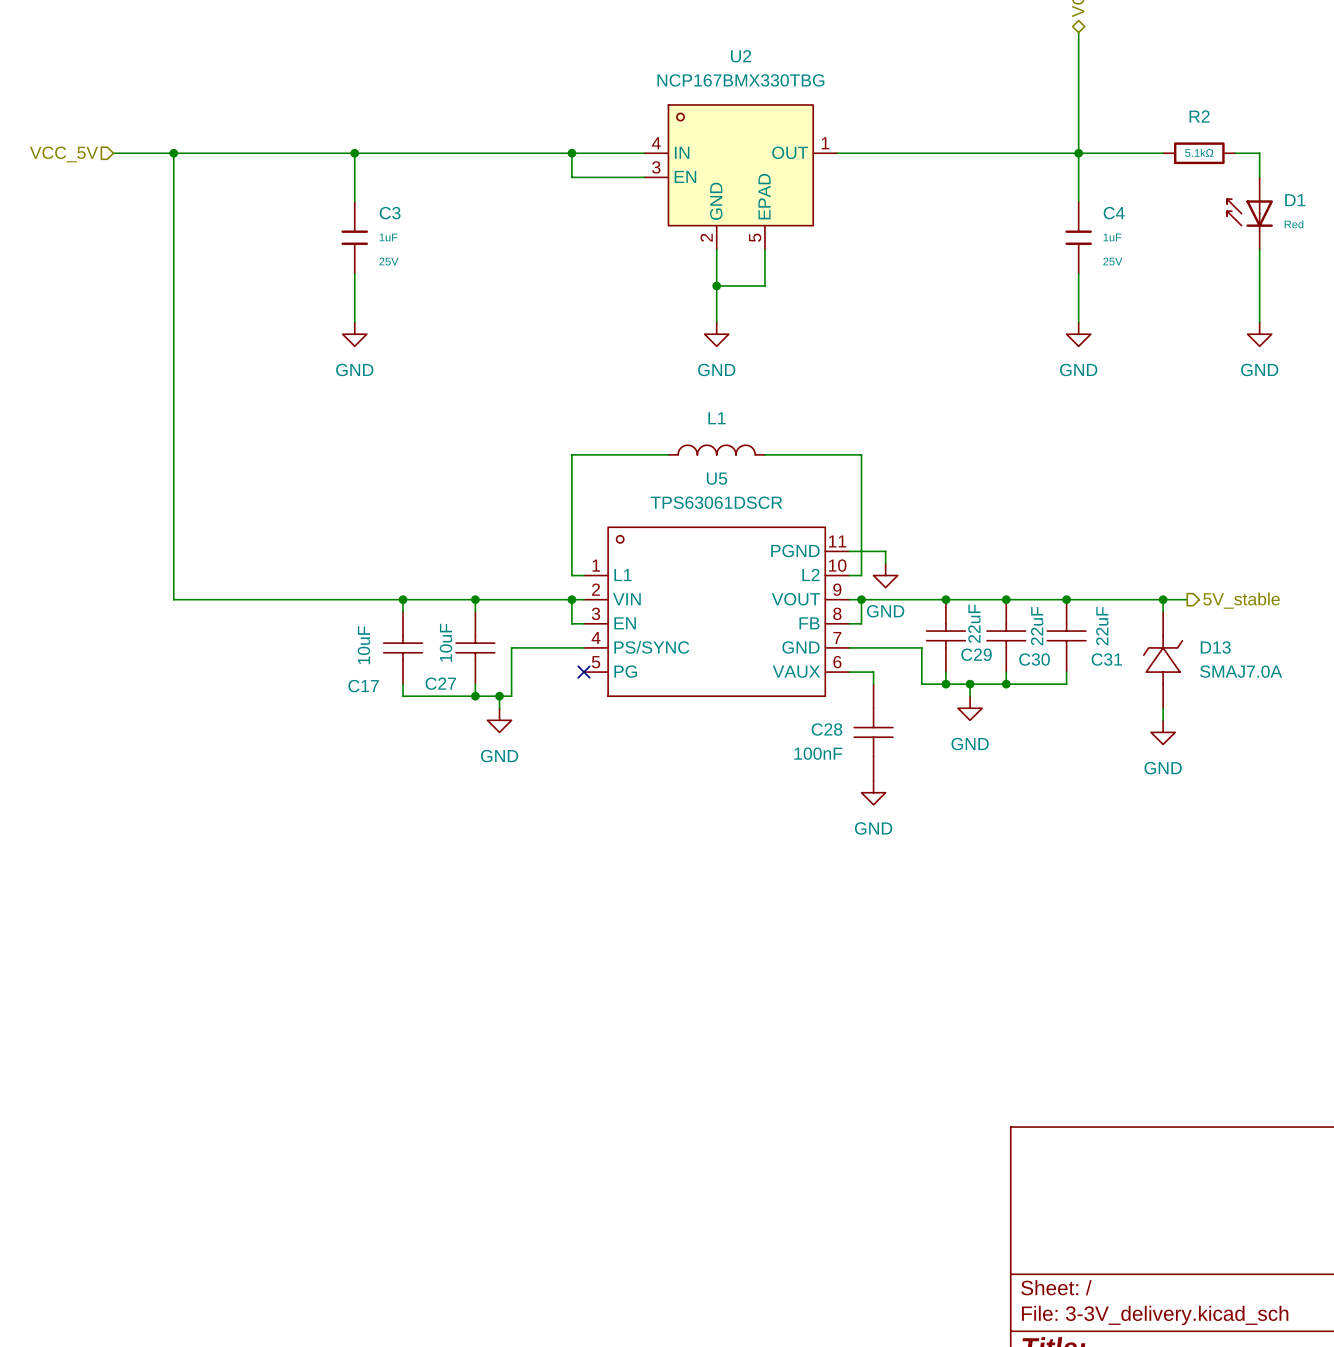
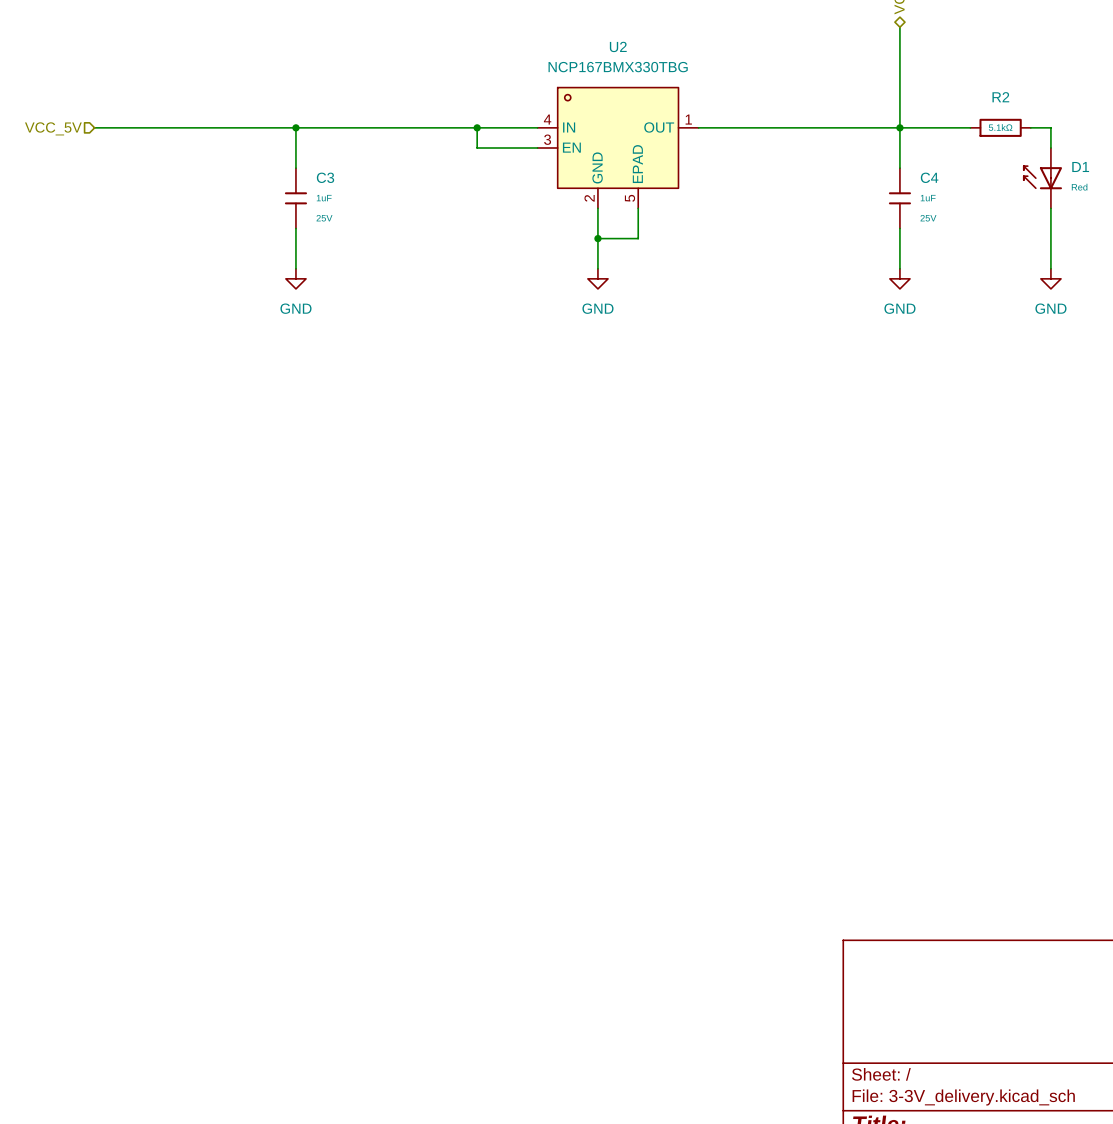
wire: (173, 153) (173, 599) (583, 599) -> none
junction: (173, 153) -> none
L1: (716, 450) -> none
wire: (668, 454) (571, 454) (571, 575) (583, 575) -> none
wire: (764, 454) (861, 454) (861, 575) (849, 575) -> none
wire: (849, 551) (885, 551) (885, 563) -> none
power symbol: GND (885, 575) -> none
wire: (403, 599) (403, 611) -> none
junction: (403, 599) -> none
wire: (475, 599) (475, 611) -> none
junction: (475, 599) -> none
wire: (571, 599) (571, 623) (583, 623) -> none
junction: (571, 599) -> none
wire: (849, 599) (1187, 599) -> none
wire: (861, 599) (861, 623) (849, 623) -> none
junction: (861, 599) -> none
junction: (945, 599) -> none
junction: (1006, 599) -> none
junction: (1066, 599) -> none
wire: (1163, 599) (1163, 611) -> none
junction: (1163, 599) -> none
hierarchical label: 5V_stable (1241, 600) -> none
U5: TPS63061DSCR (716, 611) -> none
C29: 22uF (945, 635) -> none
C30: 22uF (1006, 635) -> none
C31: 22uF (1066, 635) -> none
C17: 10uF (403, 647) -> none
C27: 10uF (475, 647) -> none
wire: (583, 647) (511, 647) (511, 696) (403, 696) (403, 684) -> none
wire: (849, 647) (921, 647) (921, 684) (1066, 684) (1066, 672) -> none
D13: SMAJ7.0A (1163, 660) -> none
no-connect mark: (583, 672) -> none
wire: (849, 672) (873, 672) (873, 684) -> none
wire: (945, 672) (945, 684) -> none
wire: (1006, 672) (1006, 684) -> none
wire: (475, 684) (475, 696) -> none
junction: (945, 684) -> none
wire: (970, 684) (970, 696) -> none
junction: (970, 684) -> none
junction: (1006, 684) -> none
junction: (475, 696) -> none
wire: (499, 696) (499, 708) -> none
junction: (499, 696) -> none
power symbol: GND (970, 708) -> none
wire: (1163, 708) (1163, 720) -> none
power symbol: GND (499, 720) -> none
C28: 100nF (873, 732) -> none
power symbol: GND (1163, 732) -> none
power symbol: GND (873, 792) -> none

